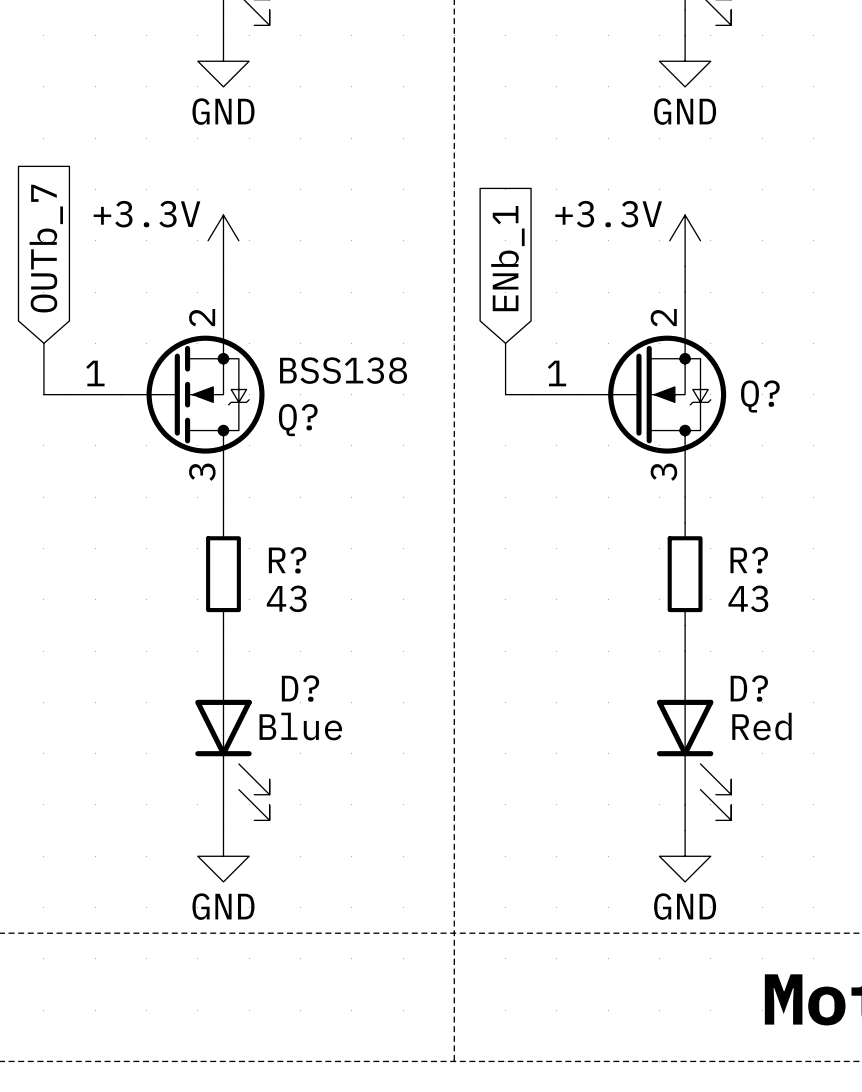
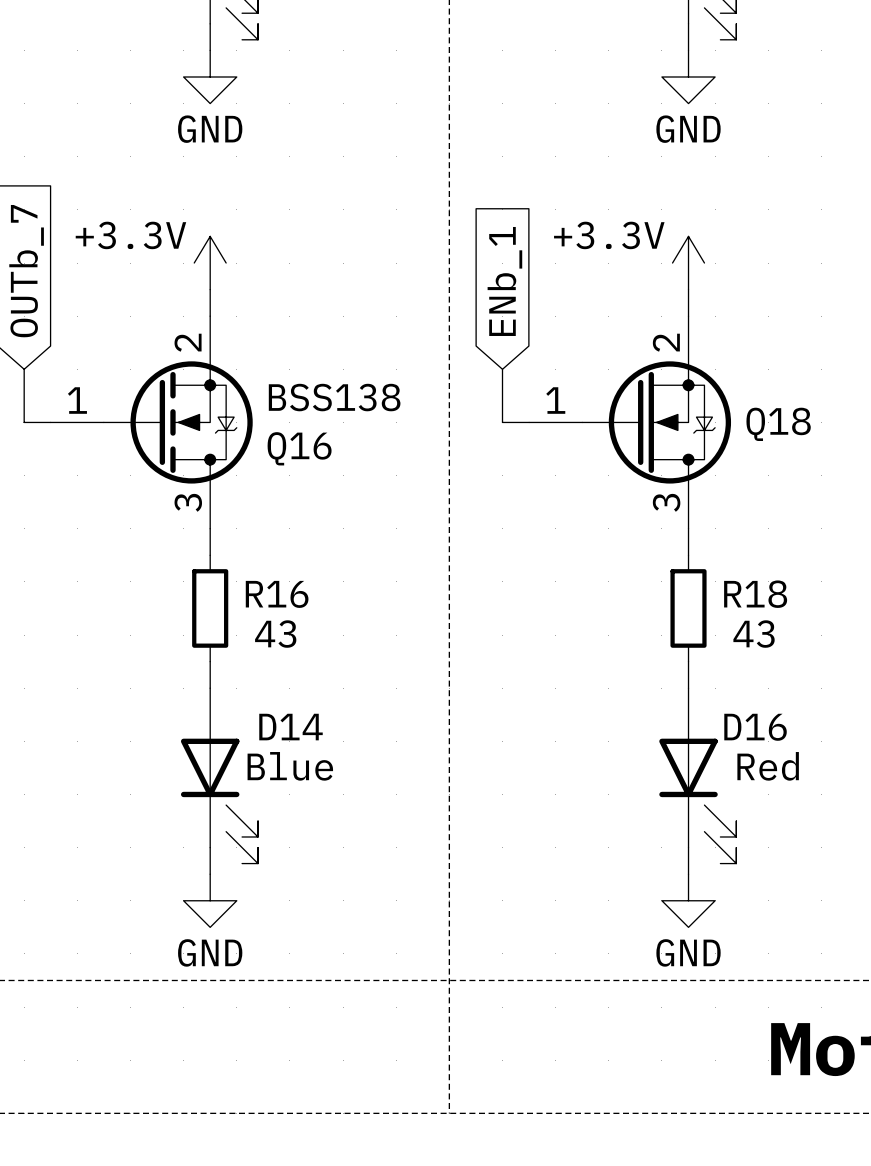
Q? name: Q? (760, 396) -> Q18 (778, 424)
Q? name: Q? (298, 420) -> Q16 (299, 448)
R? name: R? (287, 560) -> R16 (277, 594)
R? name: R? (749, 560) -> R18 (755, 594)
D? name: D? (300, 688) -> D14 (291, 727)
D? name: D? (749, 688) -> D16 (755, 727)

